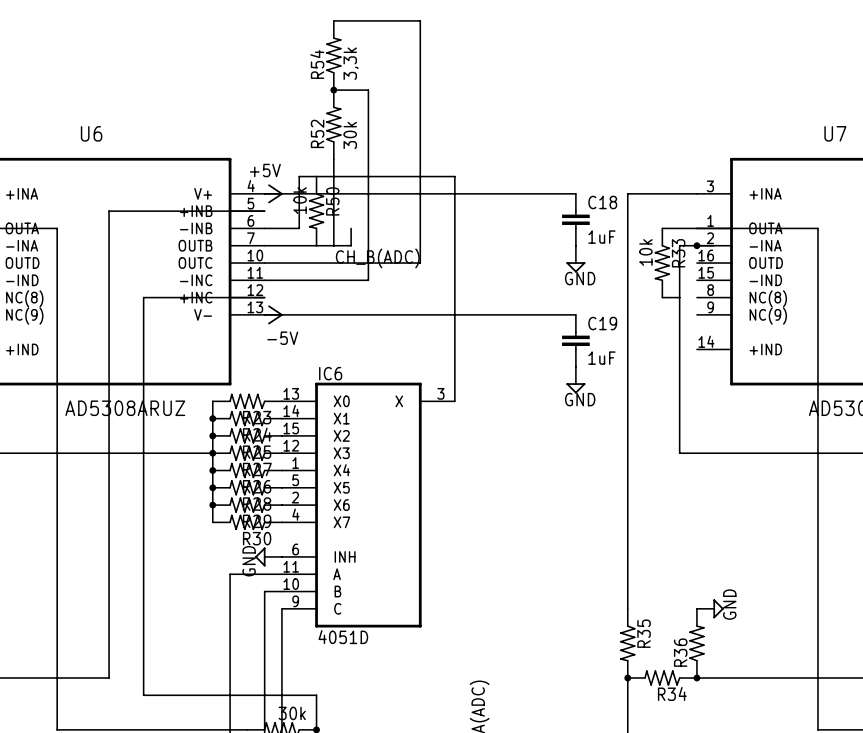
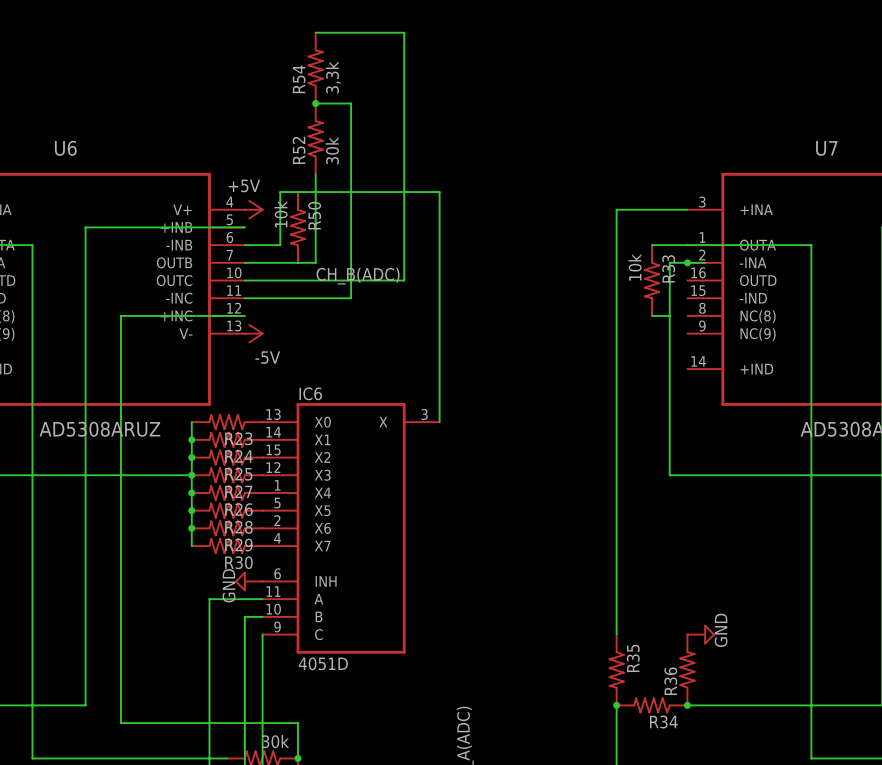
wire: (264, 193) (575, 193) -> none
C18: 1uF (575, 219) -> none
wire: (351, 228) (351, 245) (333, 245) -> none
power symbol: GND (575, 259) -> none
wire: (264, 314) (575, 314) -> none
C19: 1uF (575, 340) -> none
power symbol: GND (575, 380) -> none

